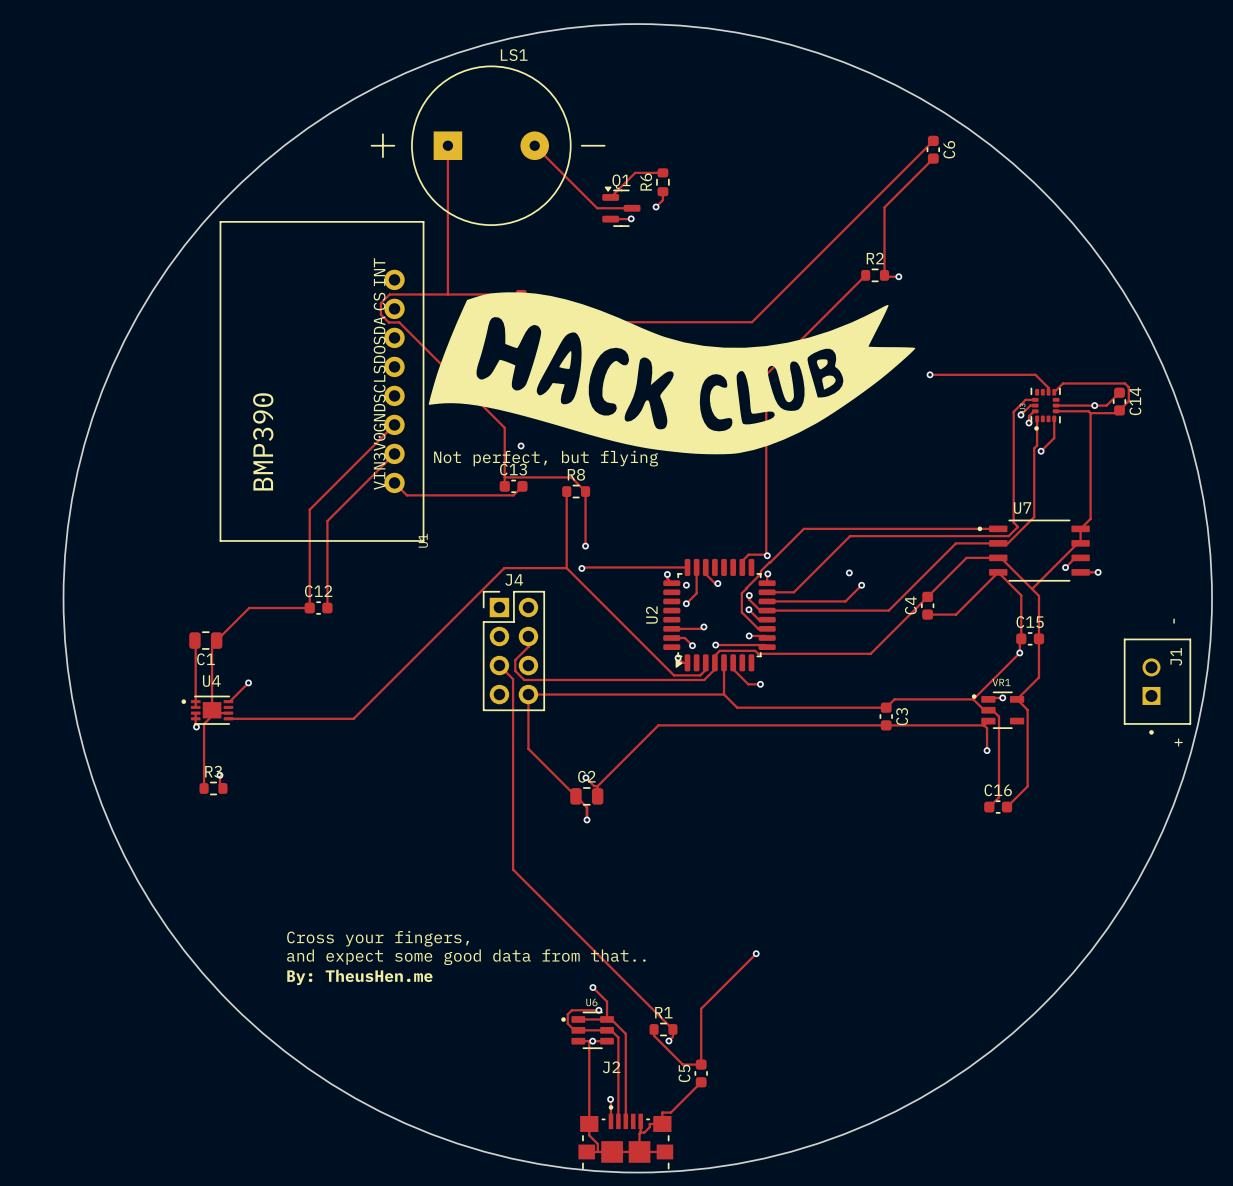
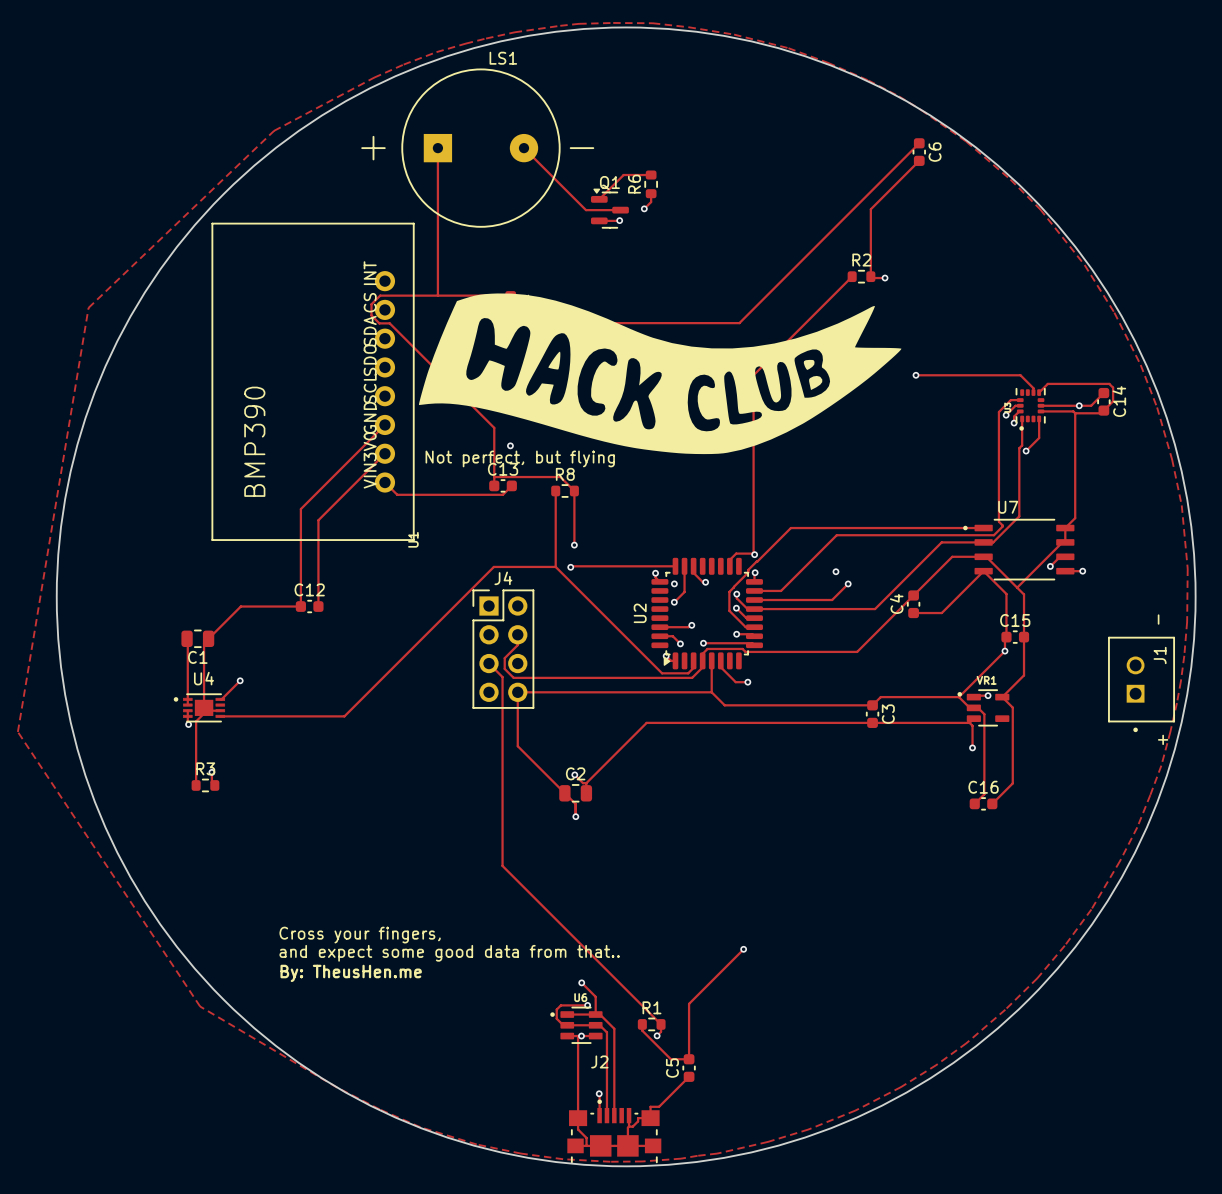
zone outline: none -> (613, 22) (579, 23) (514, 32) (436, 52) (374, 77) (274, 130) (88, 307) (17, 731) (200, 1006) (337, 1087) (420, 1127) (476, 1144) (520, 1153) (563, 1159) (642, 1161) (717, 1153) (767, 1141) (808, 1129) (855, 1110) (901, 1087) (966, 1043) (1005, 1009) (1037, 978) (1091, 909) (1120, 861) (1137, 827) (1161, 765) (1180, 681) (1187, 621) (1187, 568) (1181, 505) (1172, 459) (1157, 407) (1140, 365) (1114, 312) (1084, 265) (1040, 209) (1010, 179) (966, 141) (920, 109) (868, 80) (828, 62) (788, 48) (734, 34) (652, 23) (613, 22)

